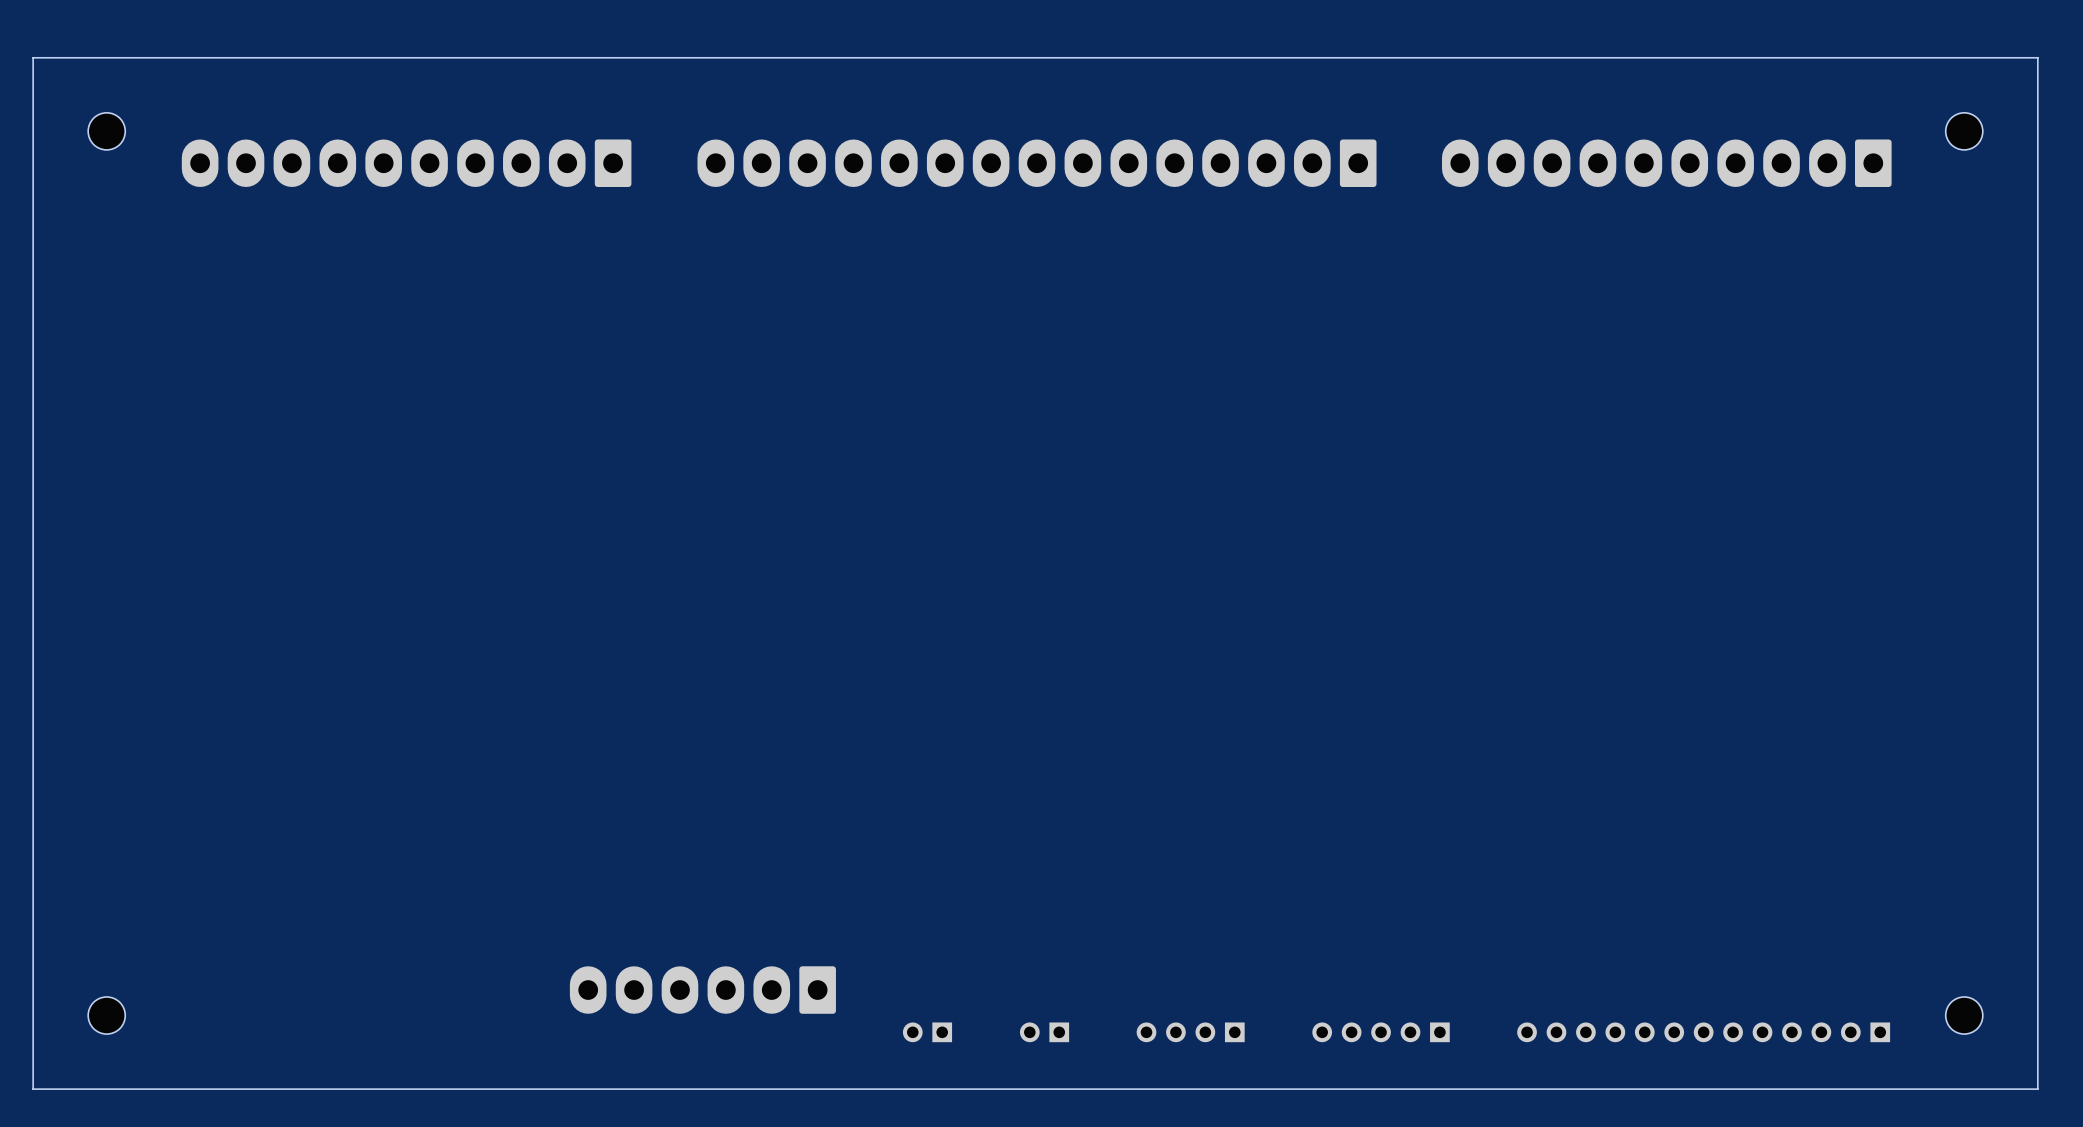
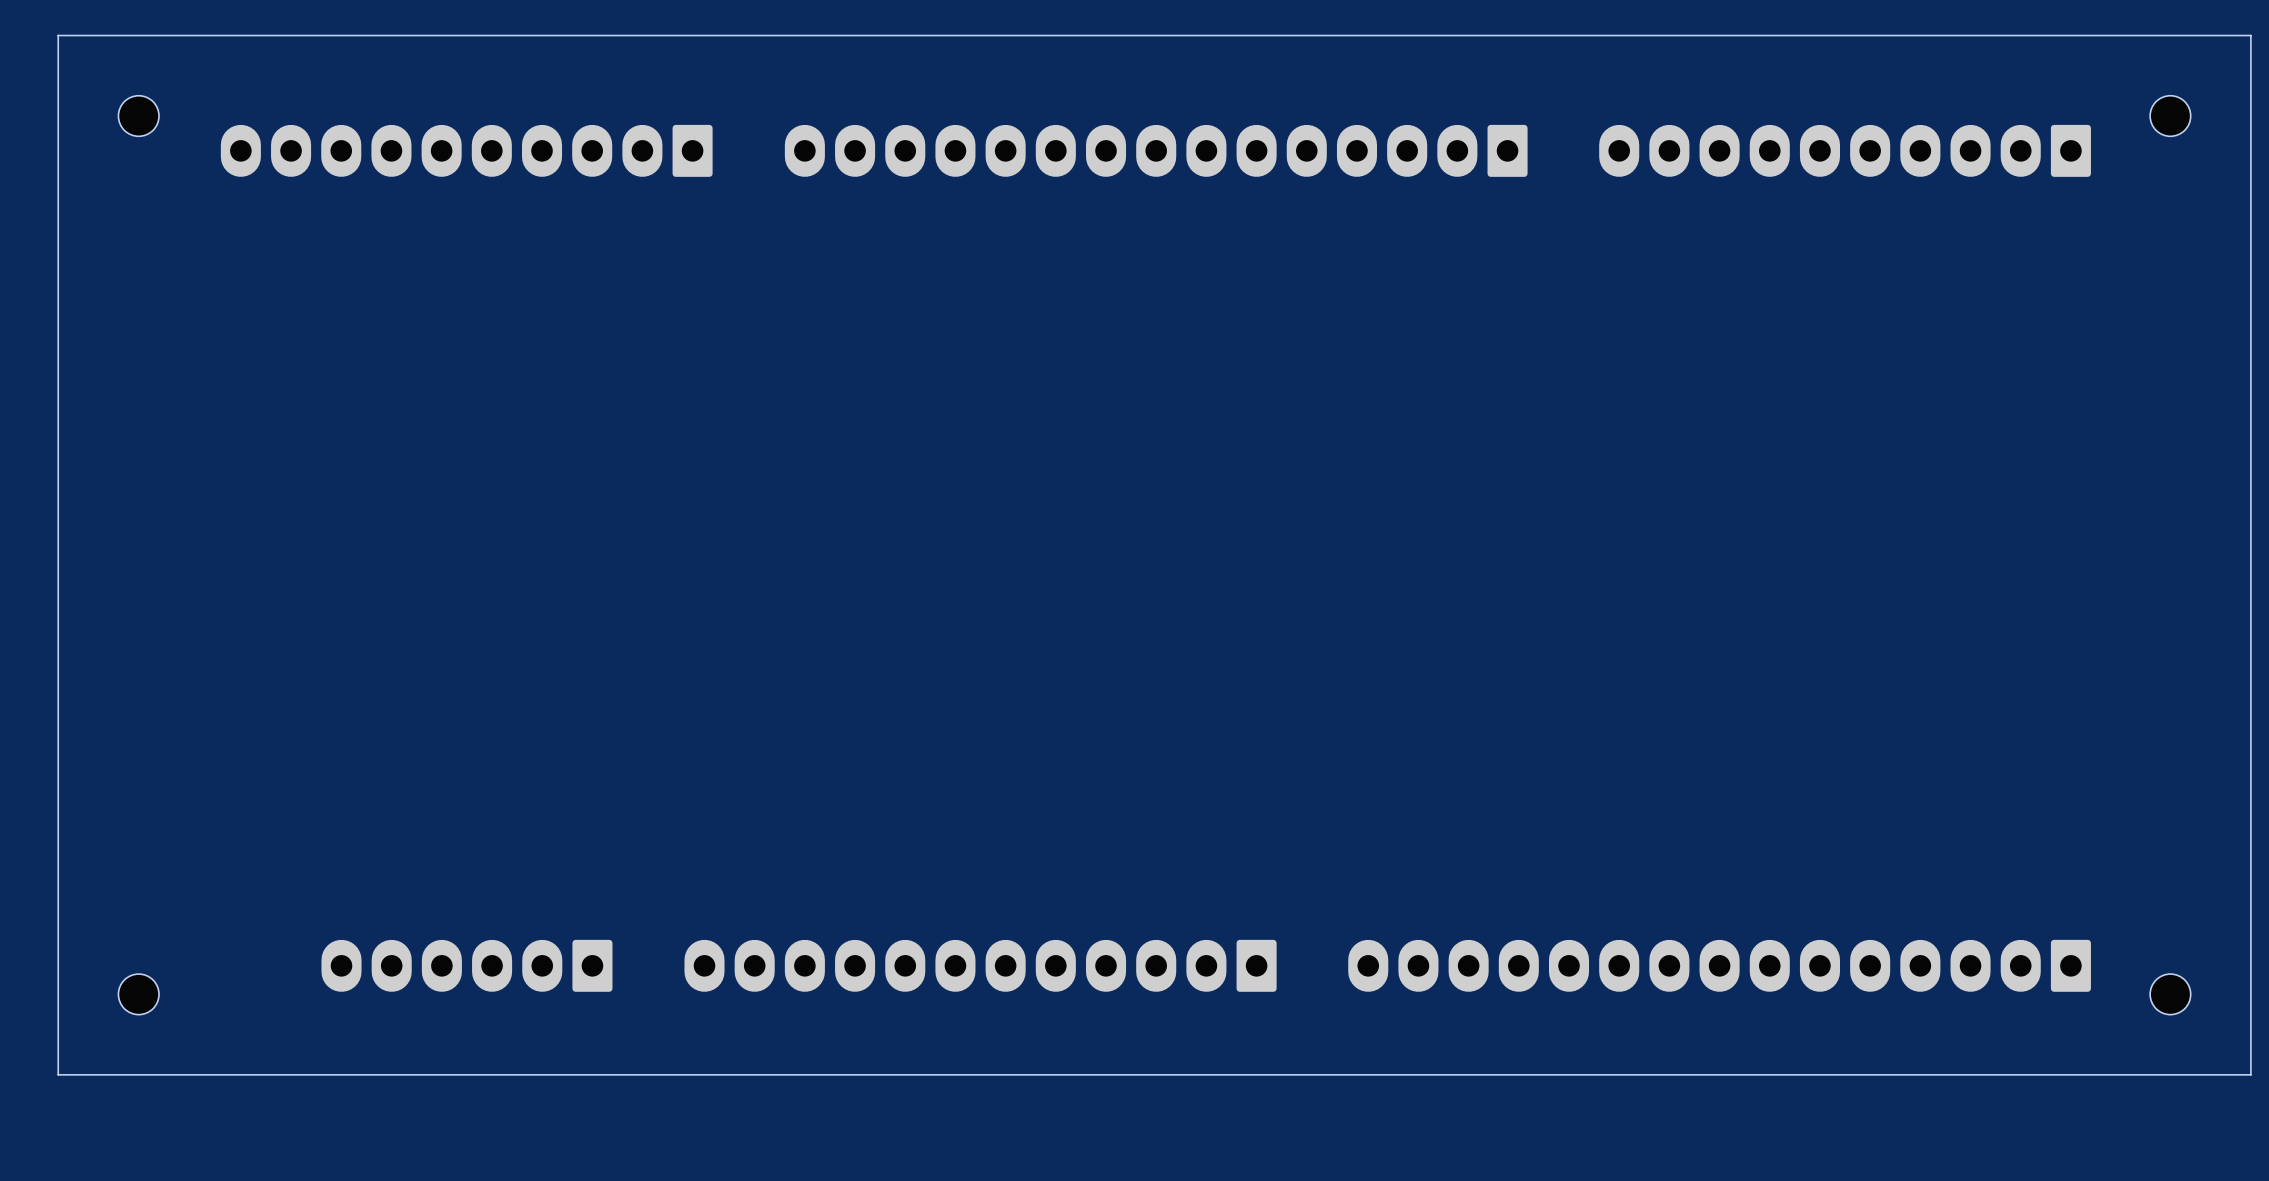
part: none -> (466, 965)
part: none -> (980, 965)
part: none -> (1719, 965)
part: (702, 990) -> none
board edge: (2037, 1007) (2037, 1089) (33, 1089) (33, 1007) -> (2250, 1074) (58, 1074)
part position: (106, 1015) -> (138, 994)
part position: (1964, 1015) -> (2170, 994)
part: (927, 1032) -> none
part: (1044, 1032) -> none
part: (1190, 1032) -> none
part: (1381, 1032) -> none
part: (1703, 1032) -> none

